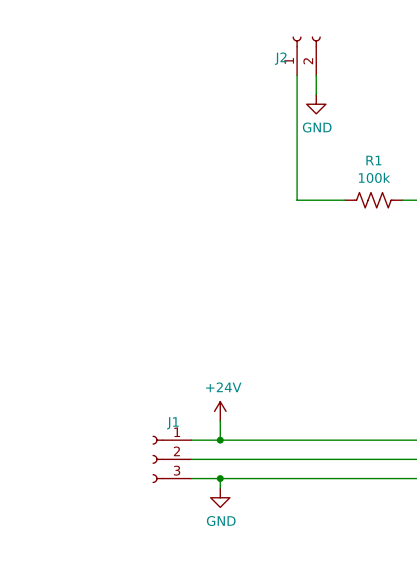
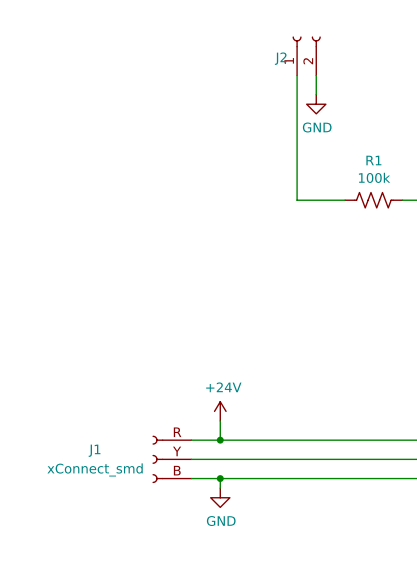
J1 name position: J1 (172, 423) -> J1 (94, 450)
J1 pin number: 1 (177, 432) -> R (177, 432)
J1 pin number: 2 (176, 451) -> Y (177, 451)
J1 value: none -> xConnect_smd (95, 469)
J1 pin number: 3 (177, 470) -> B (177, 470)

